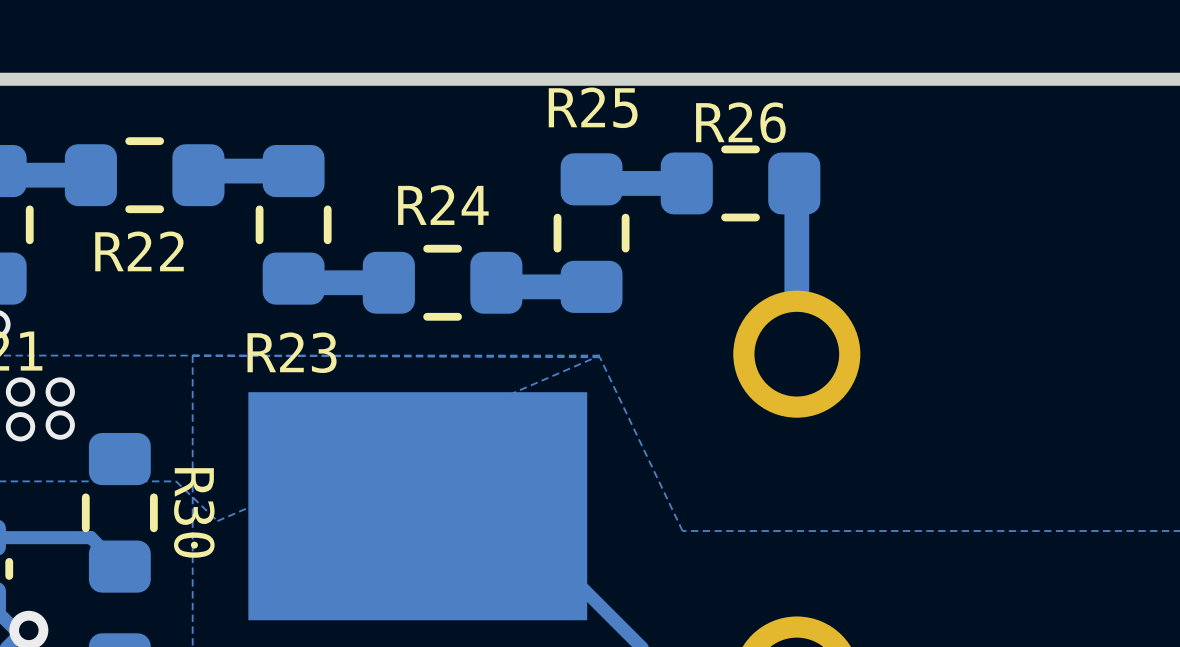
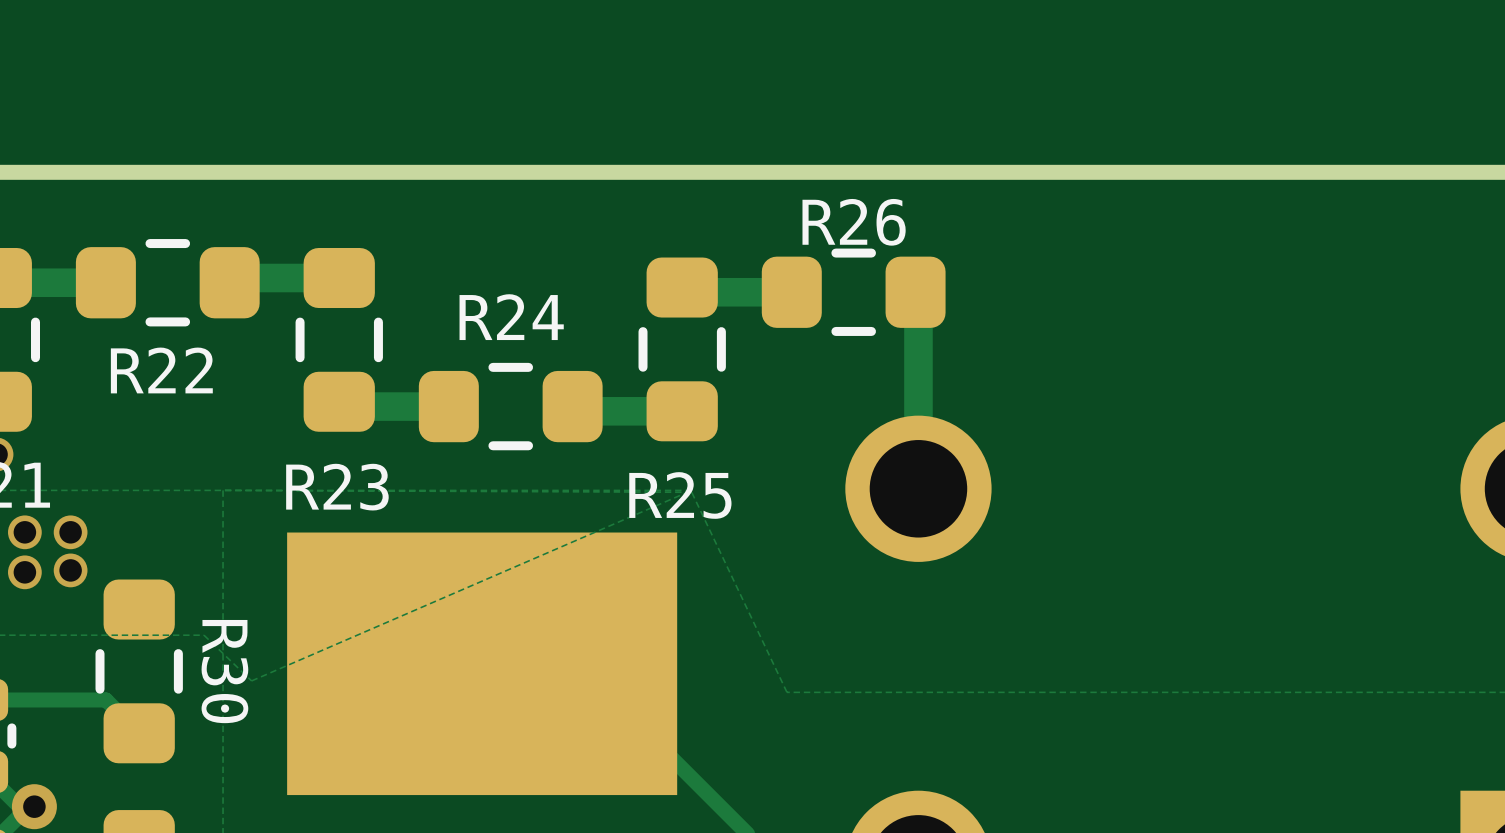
R25 name position: R25 (593, 107) -> R25 (680, 495)

